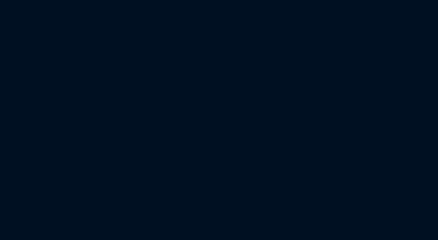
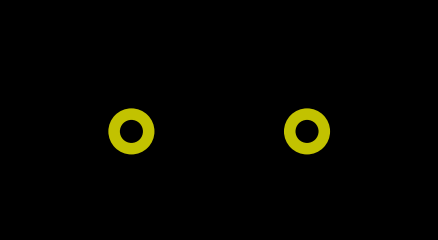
part: none -> (131, 131)
part: none -> (307, 131)

